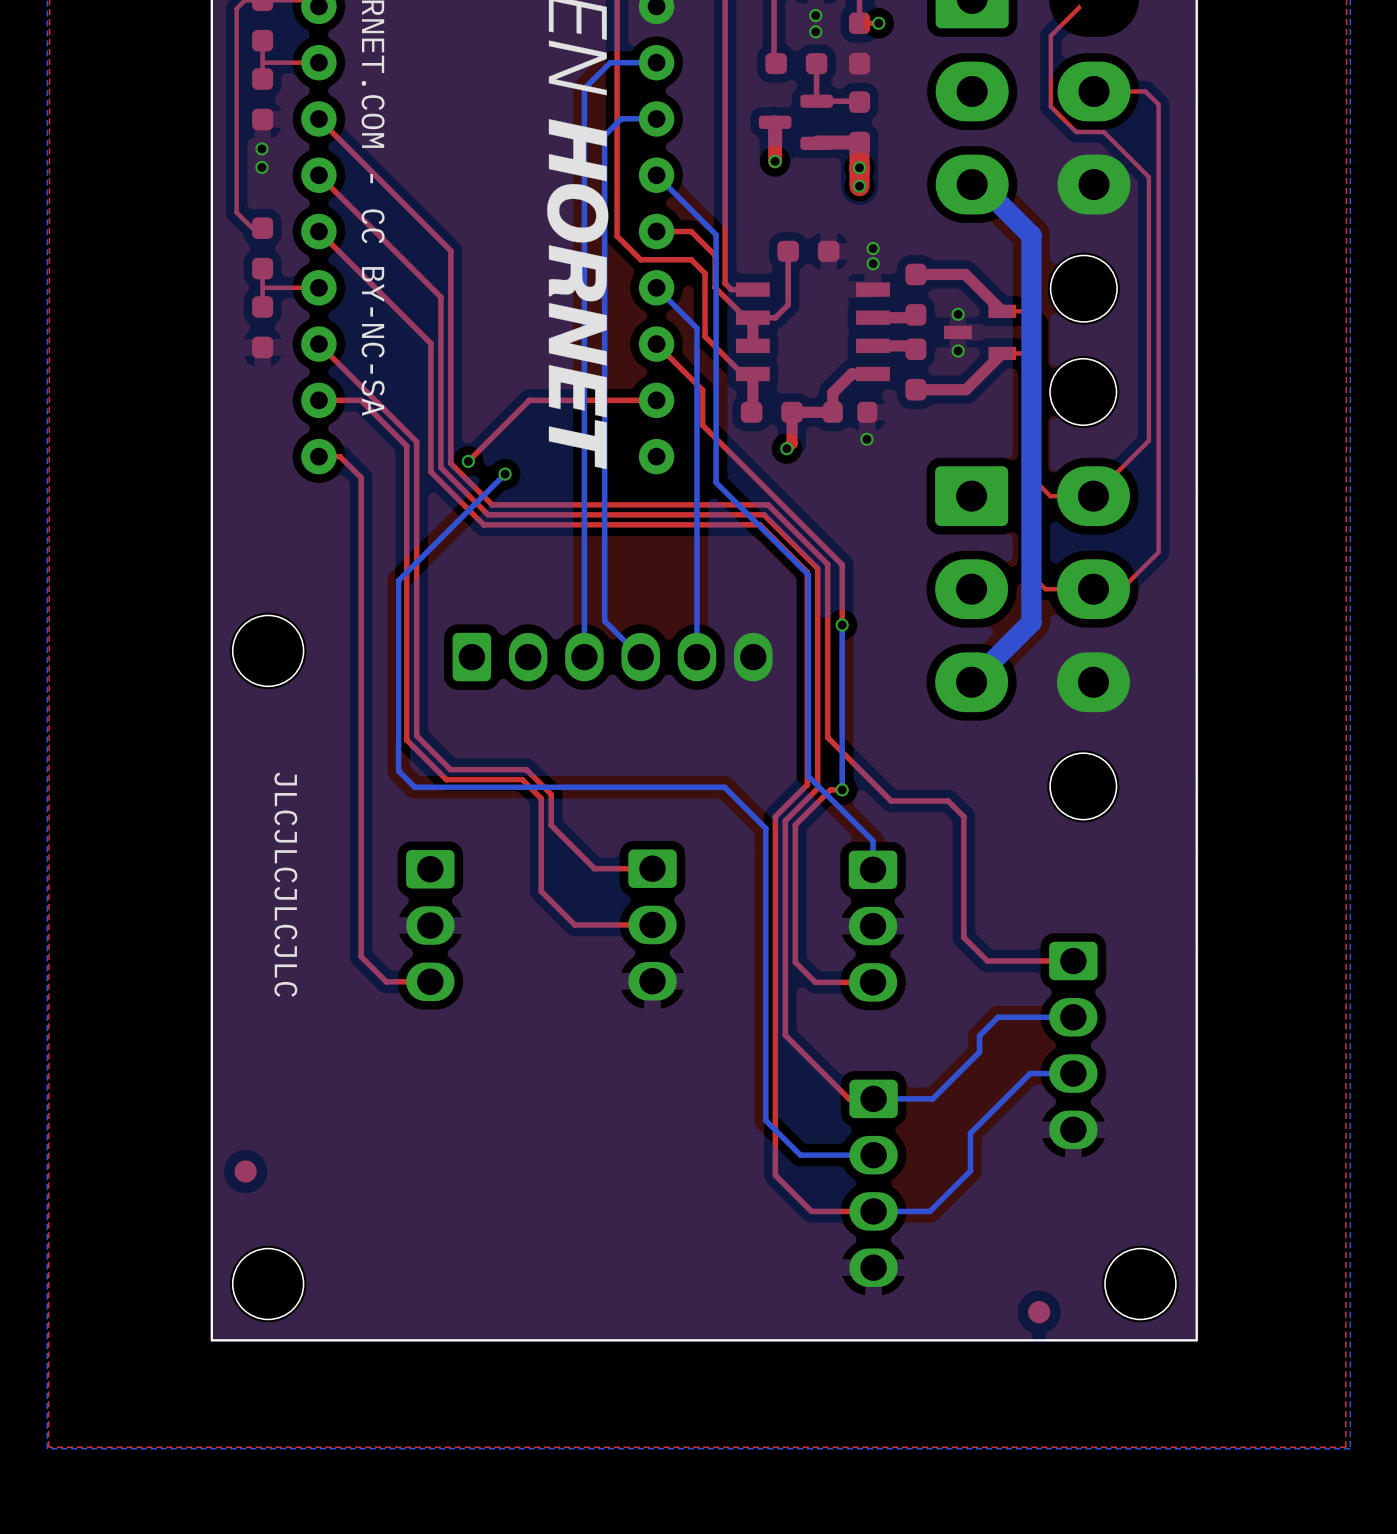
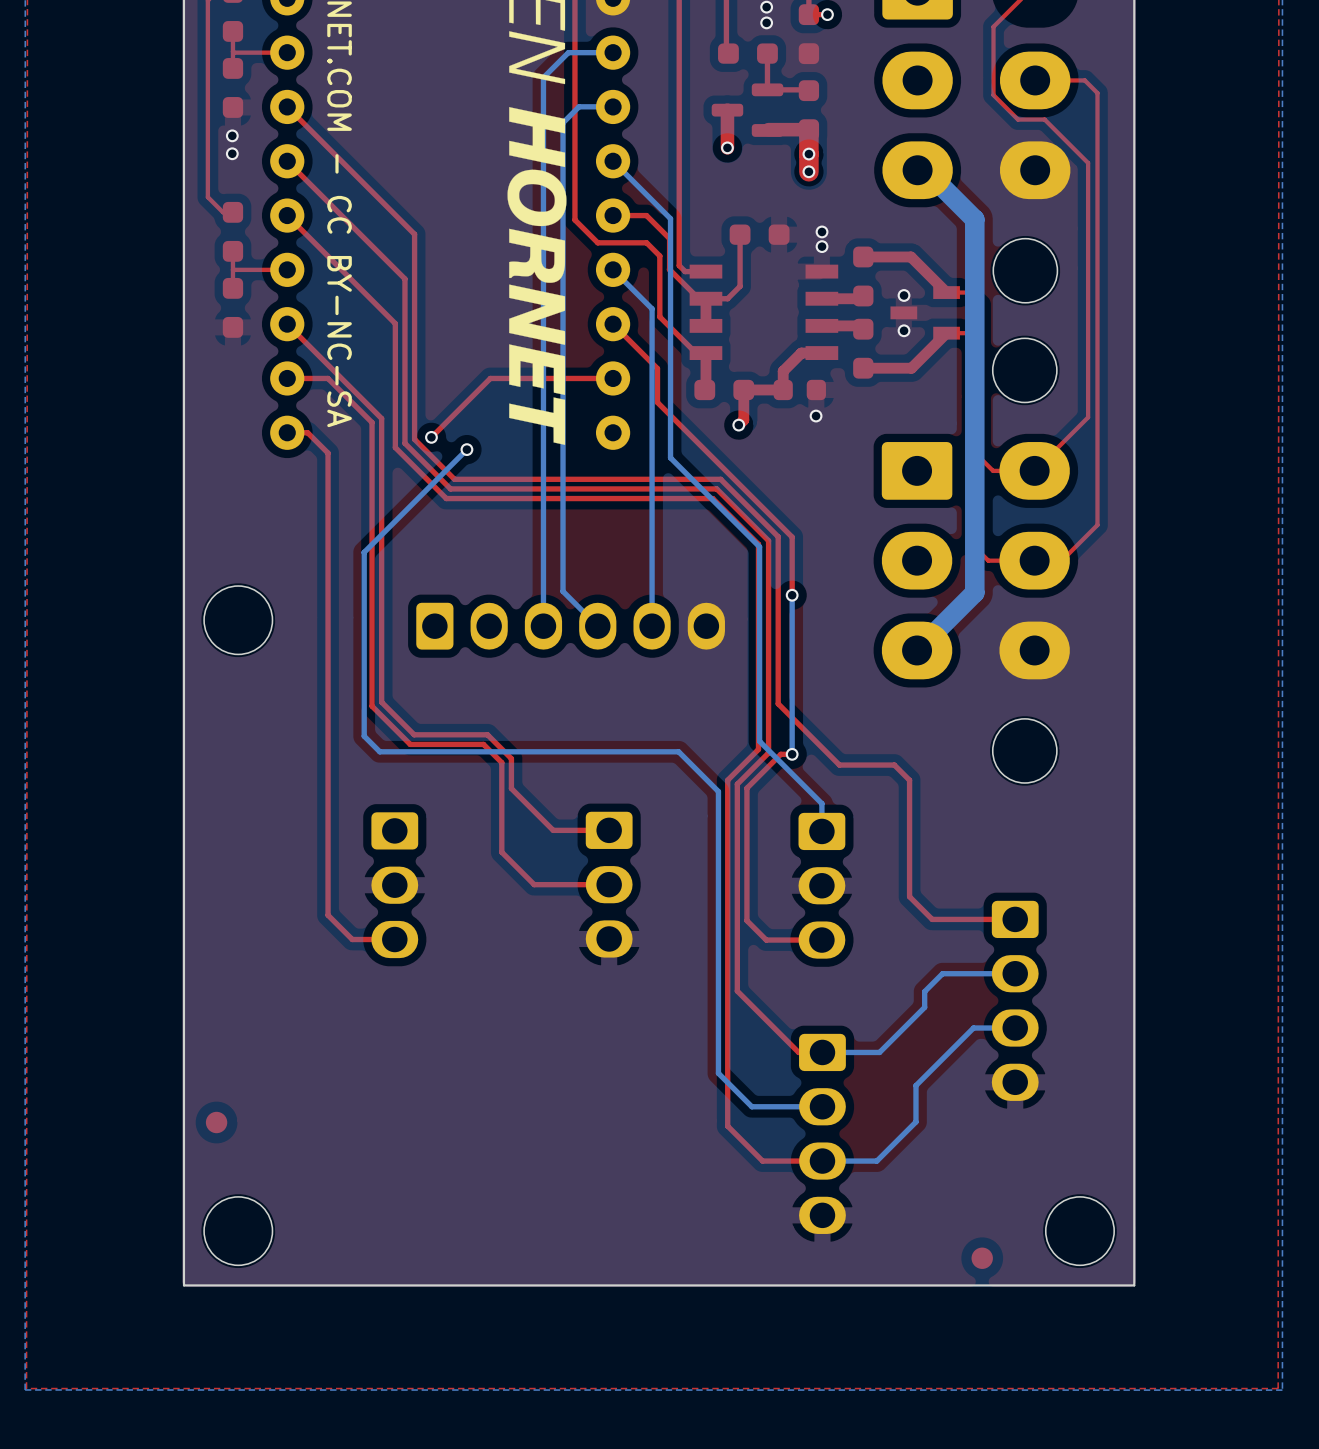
text: JLCJLCJLCJLC (285, 884) -> none

